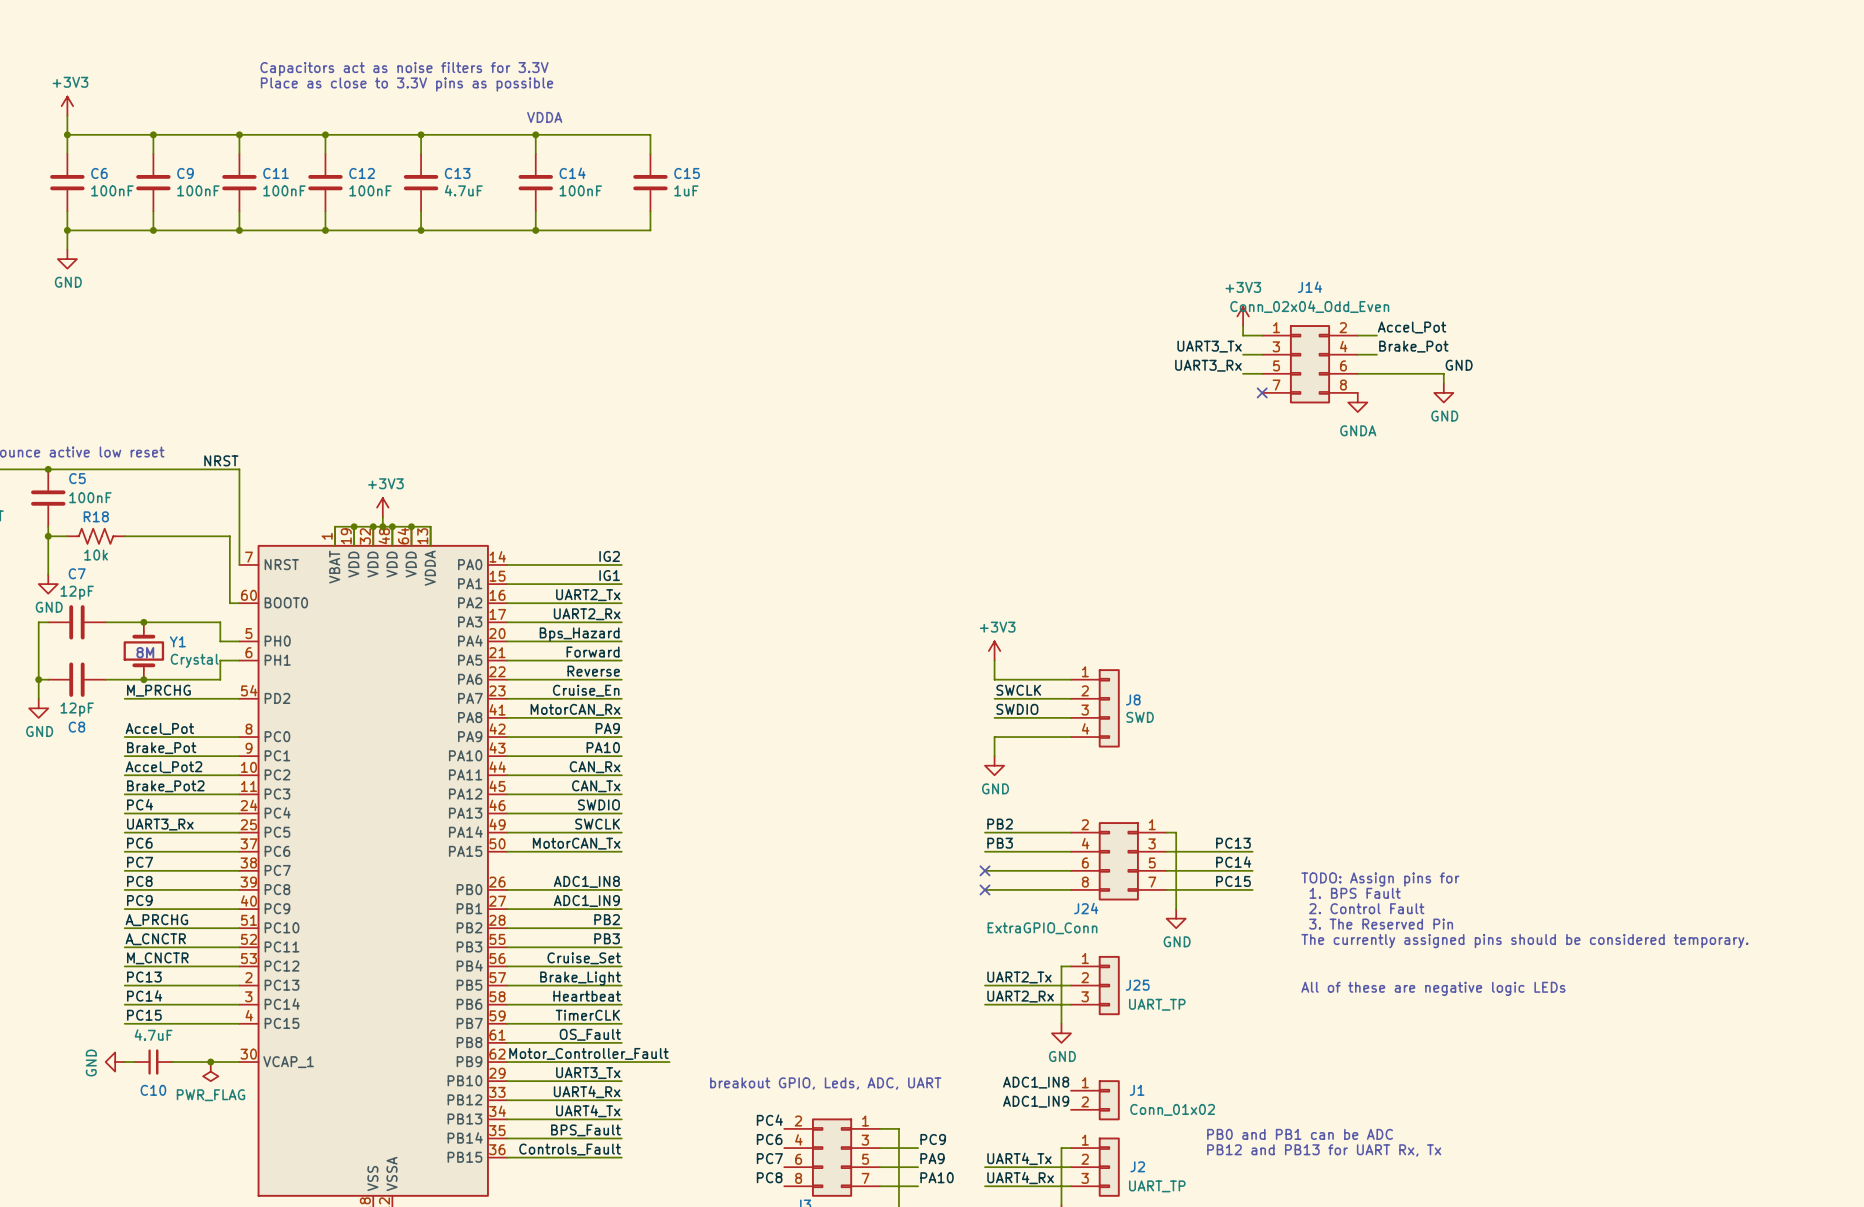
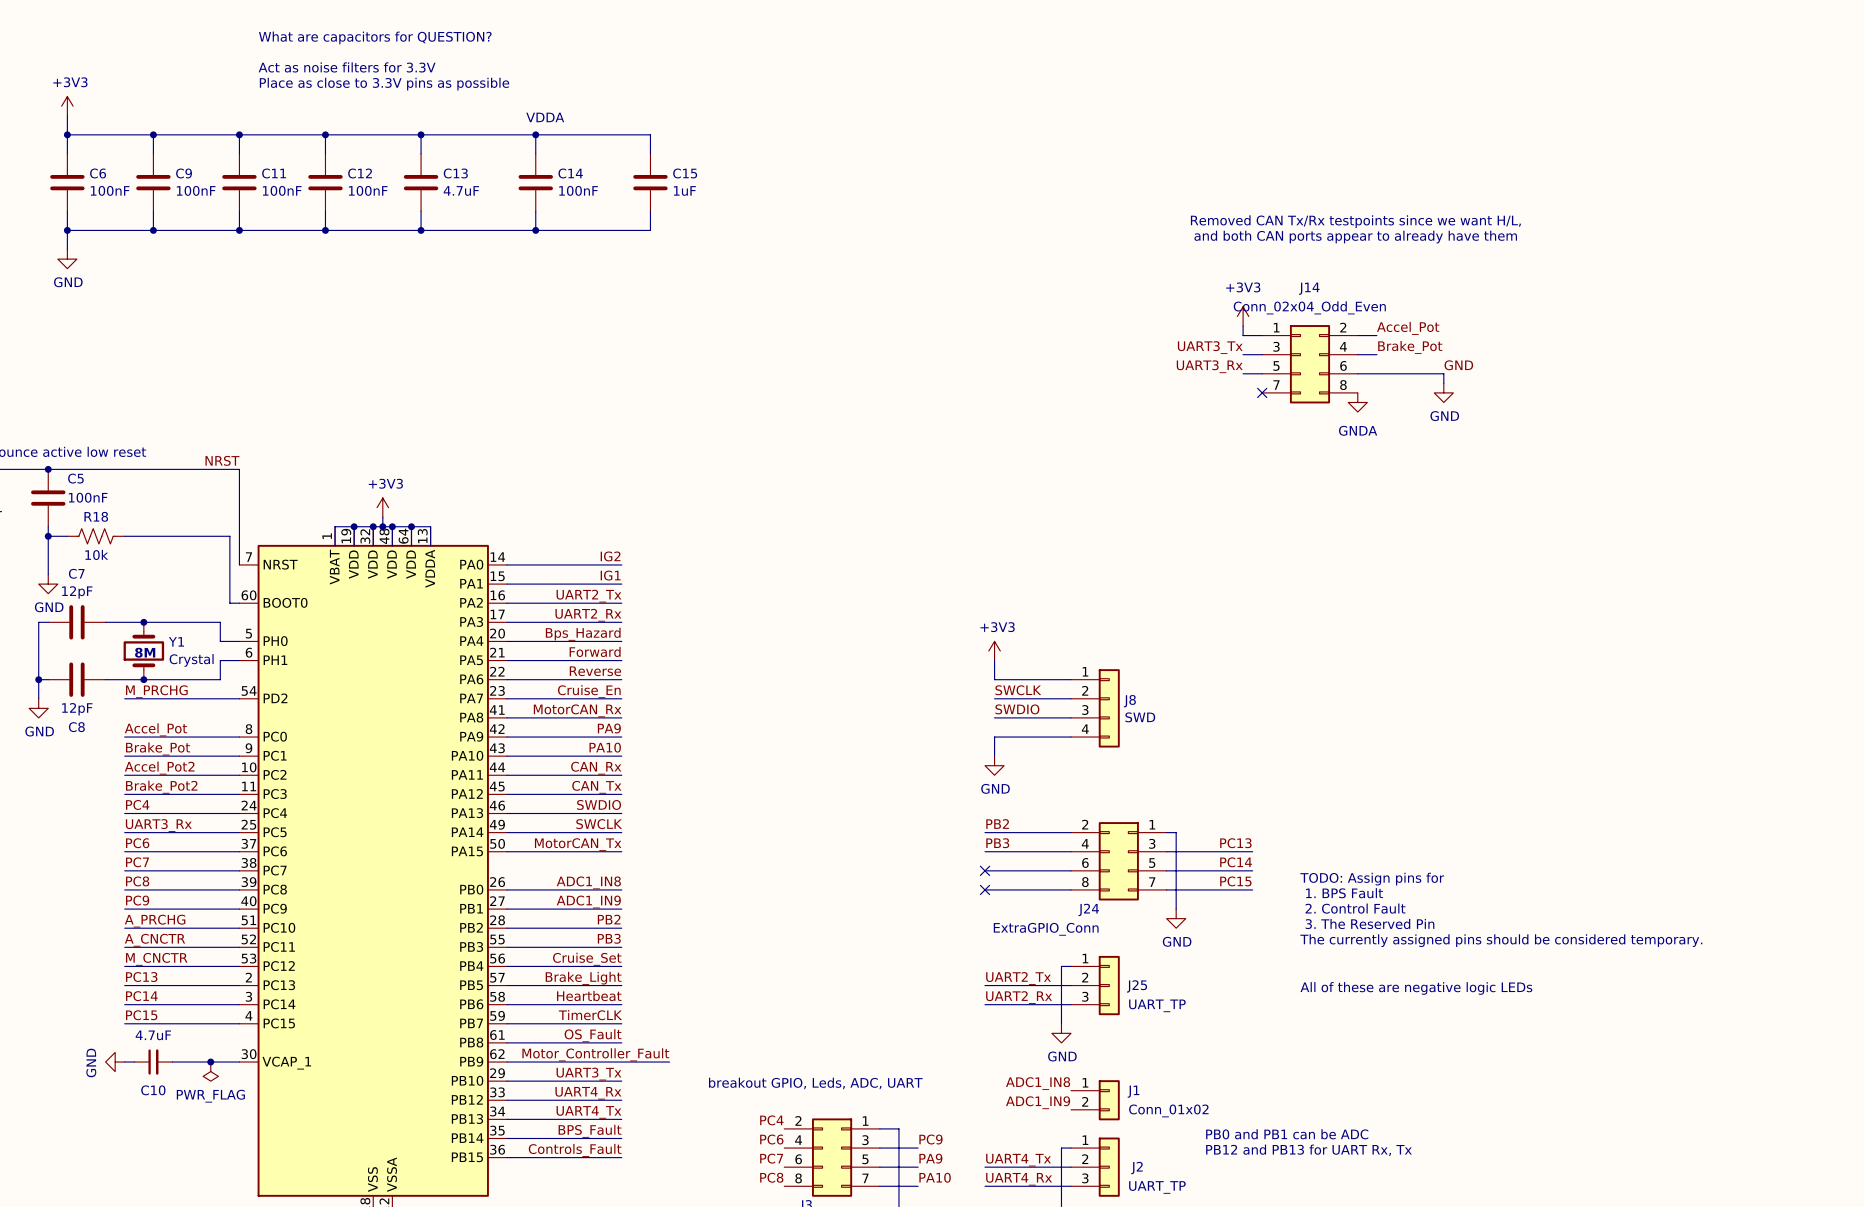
text: none -> What are capacitors for QUESTION? (375, 37)
text: Capacitors act as noise filters for 3.3V (404, 69) -> Act as noise filters for 3.3V (347, 67)
text: none -> Removed CAN Tx/Rx testpoints since we want H/L, (1355, 221)
text: none -> and both CAN ports appear to already have them (1355, 237)

